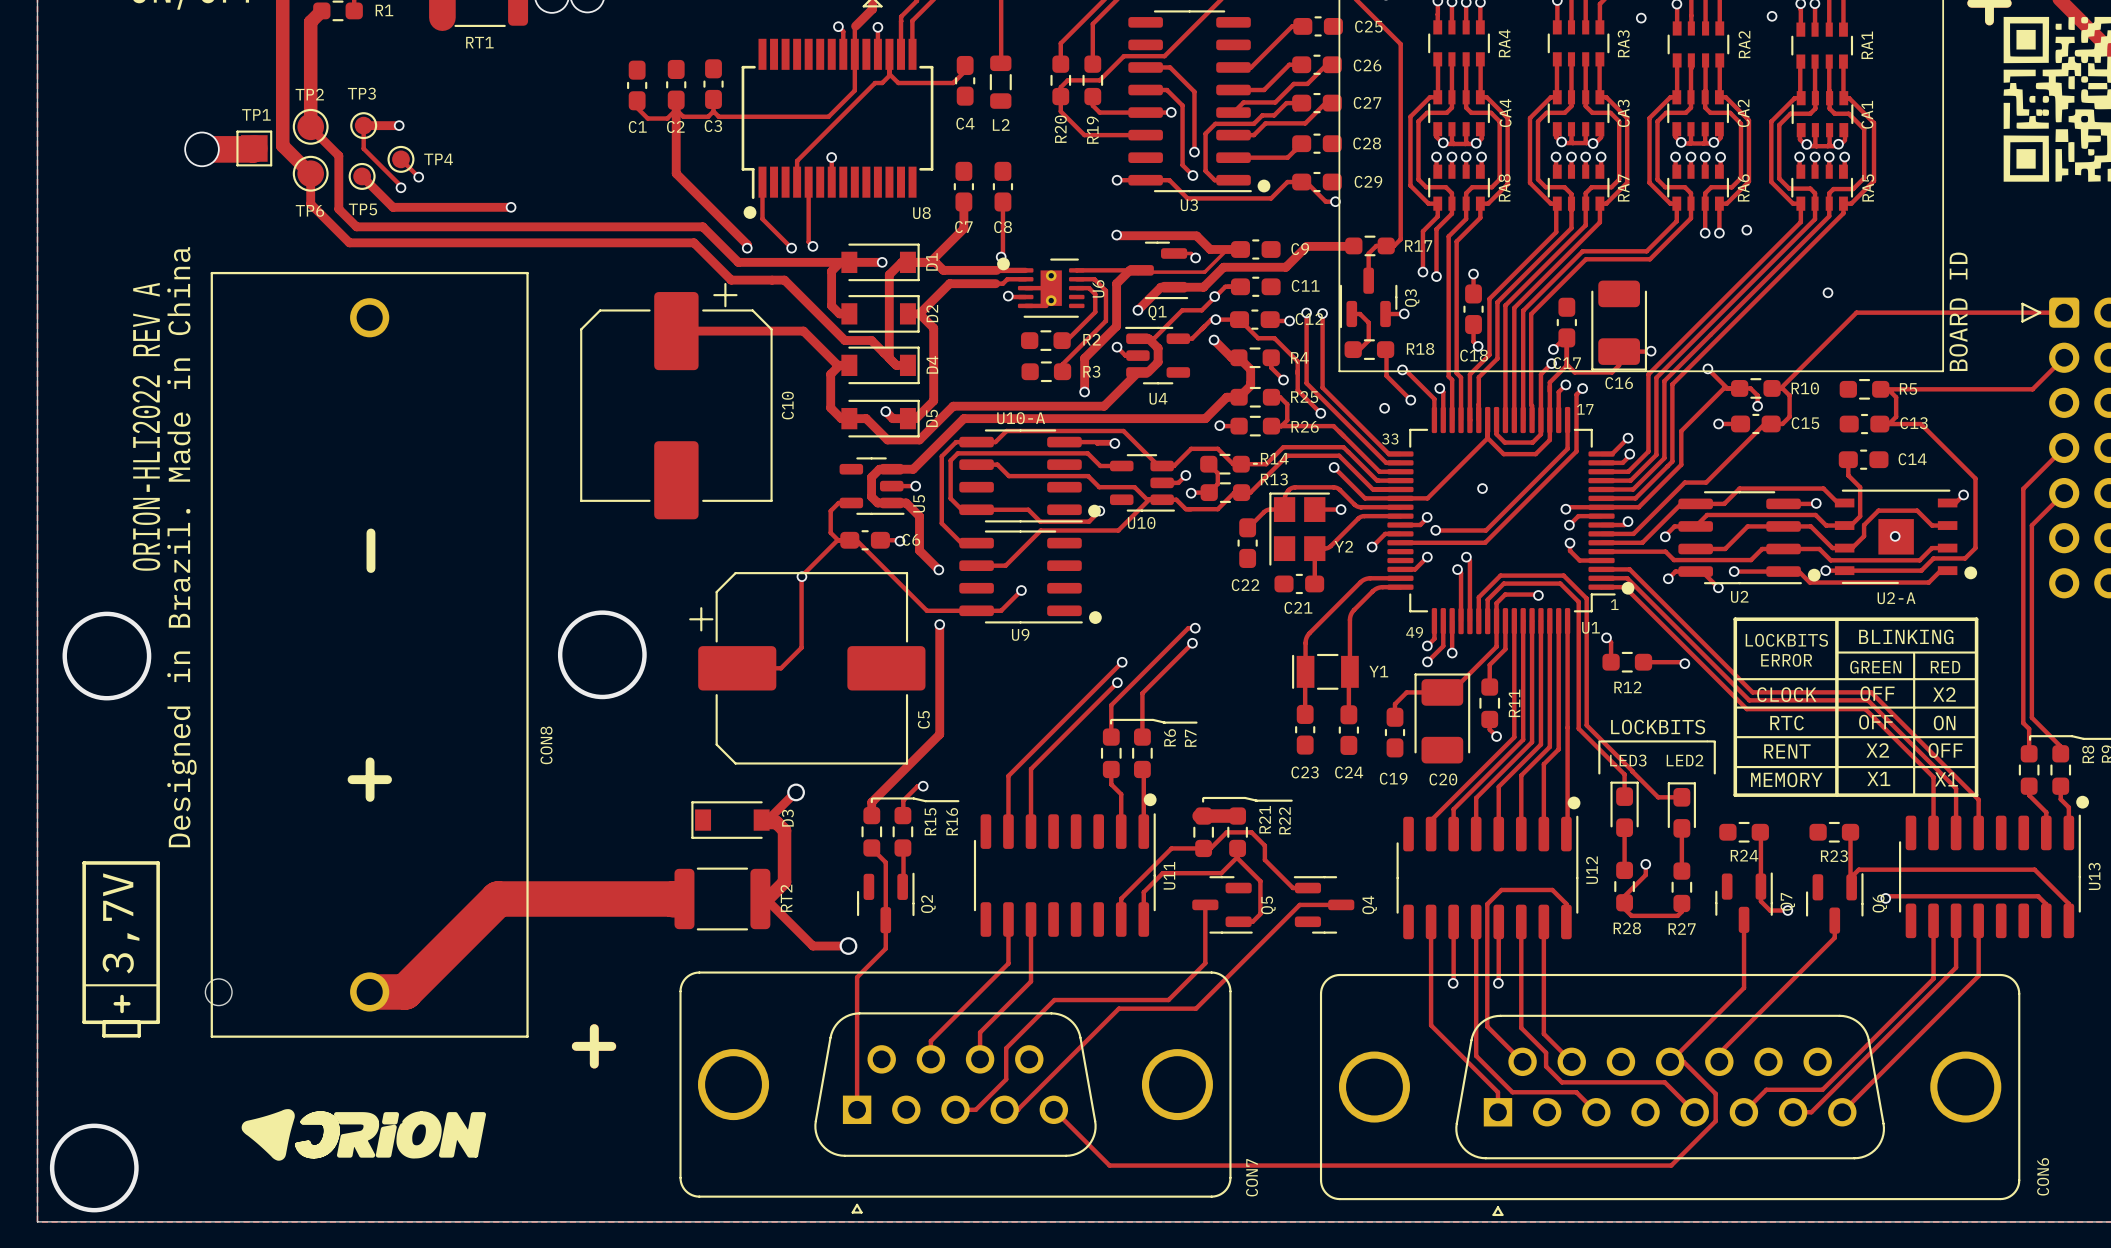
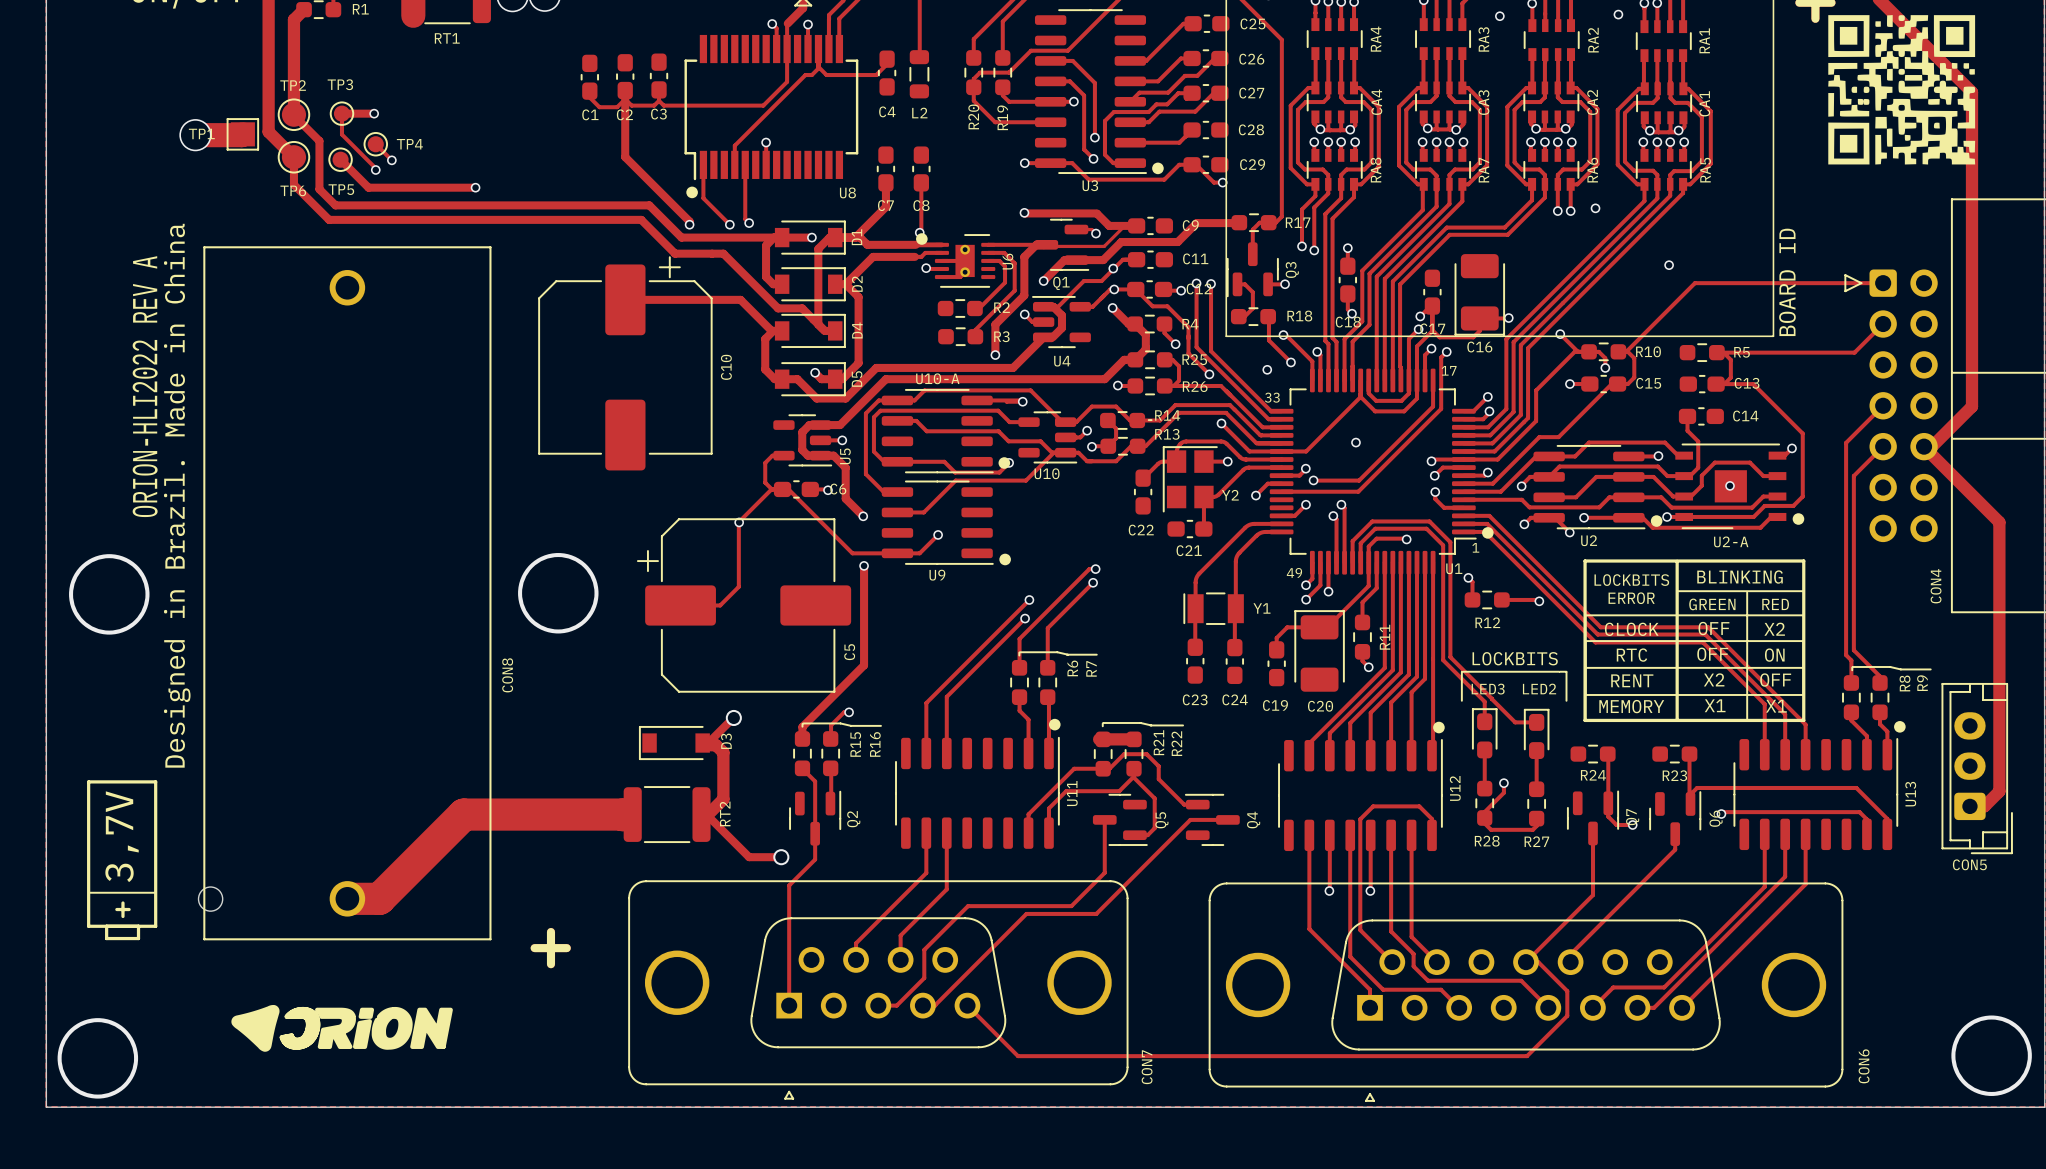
TP1 name position: TP1 (256, 114) -> TP1 (201, 133)
line: (370, 532) (370, 568) -> none
line: (370, 761) (370, 797) -> none
line: (352, 779) (387, 779) -> none

